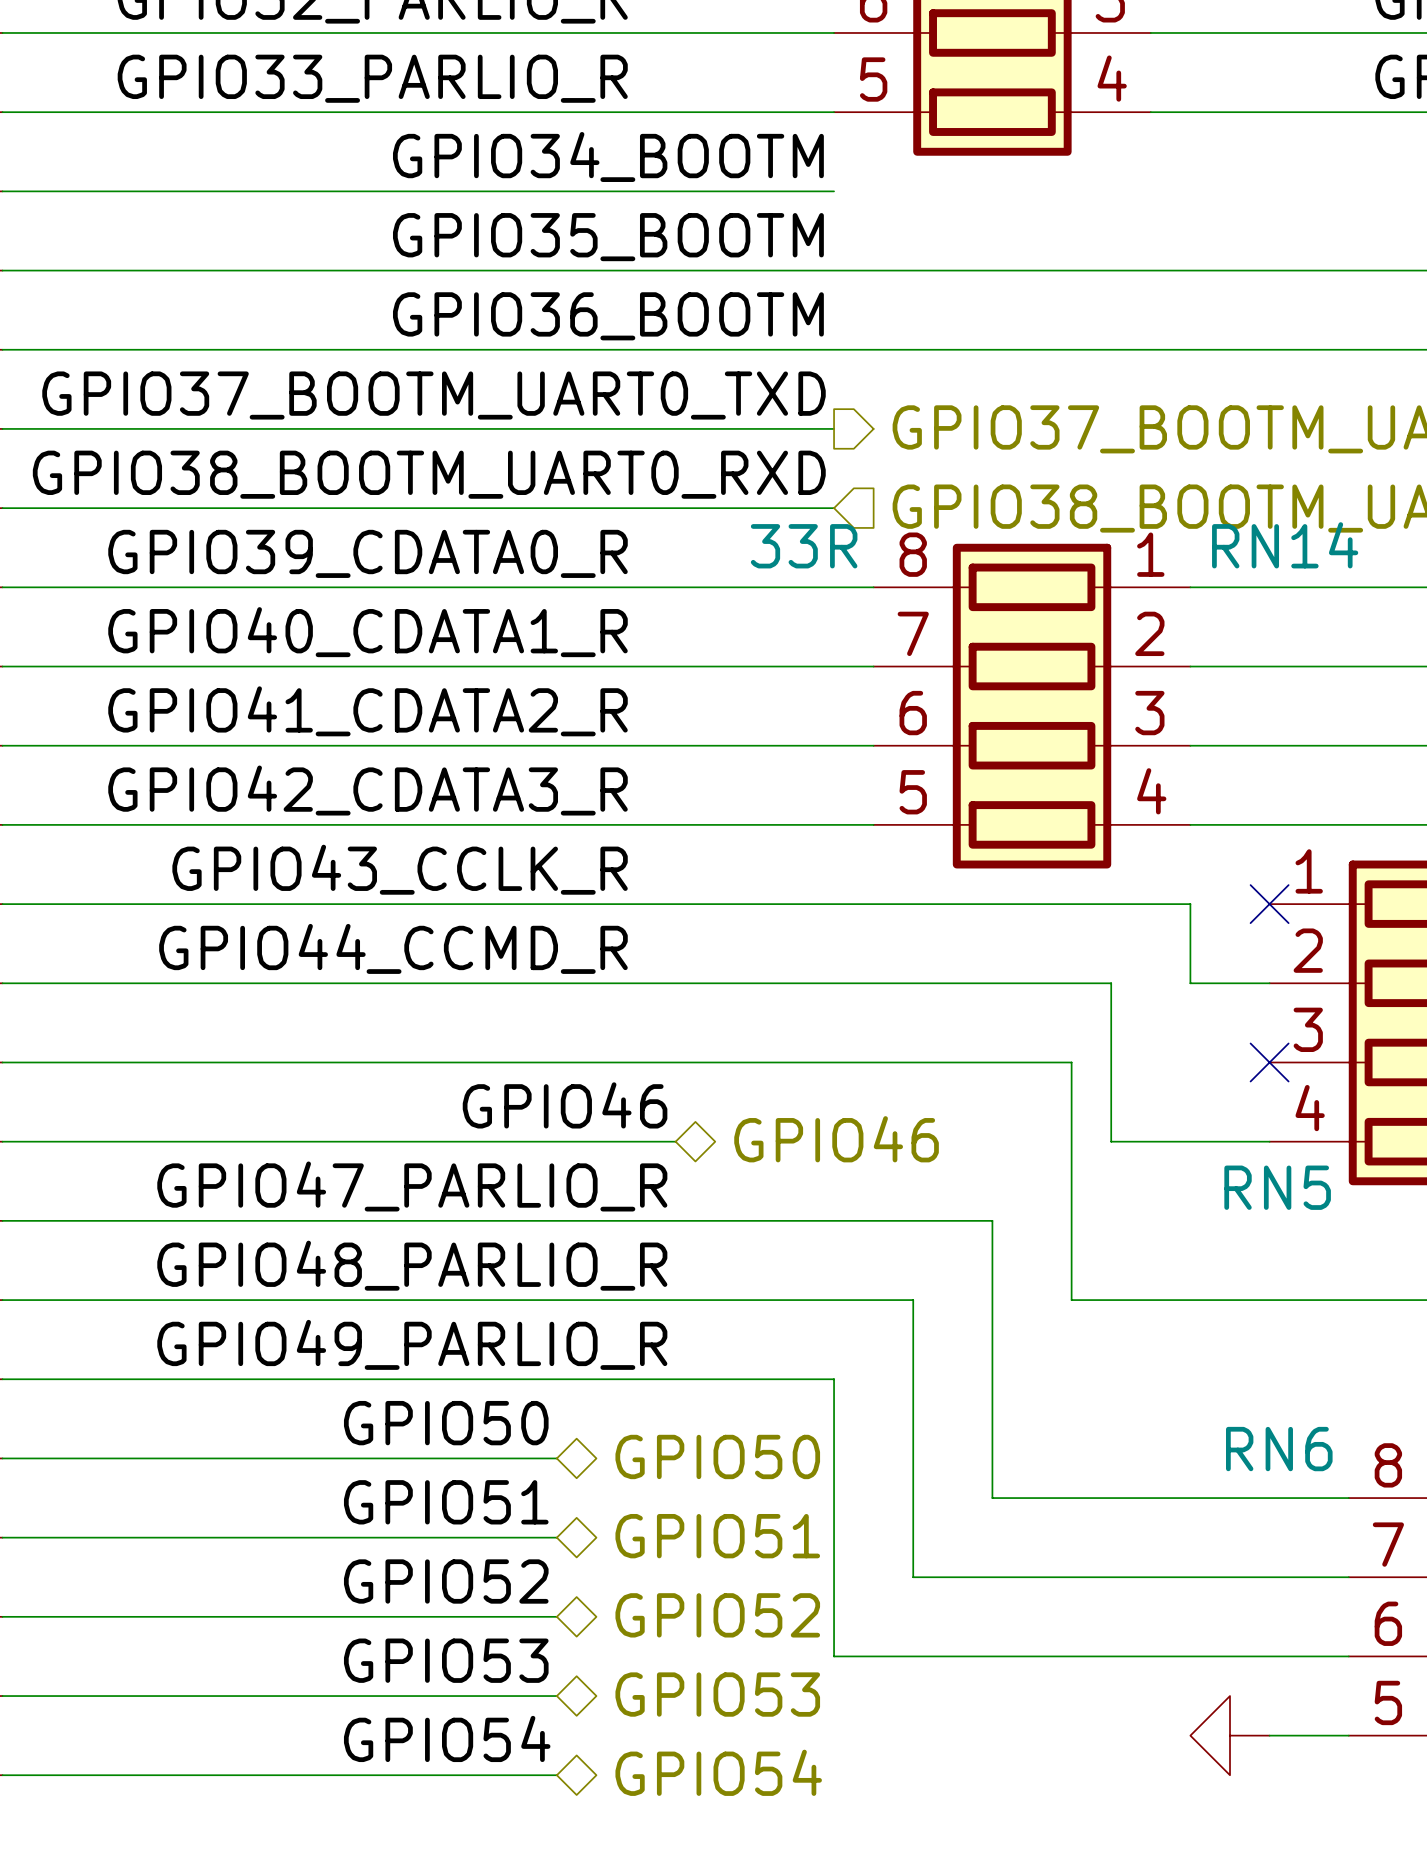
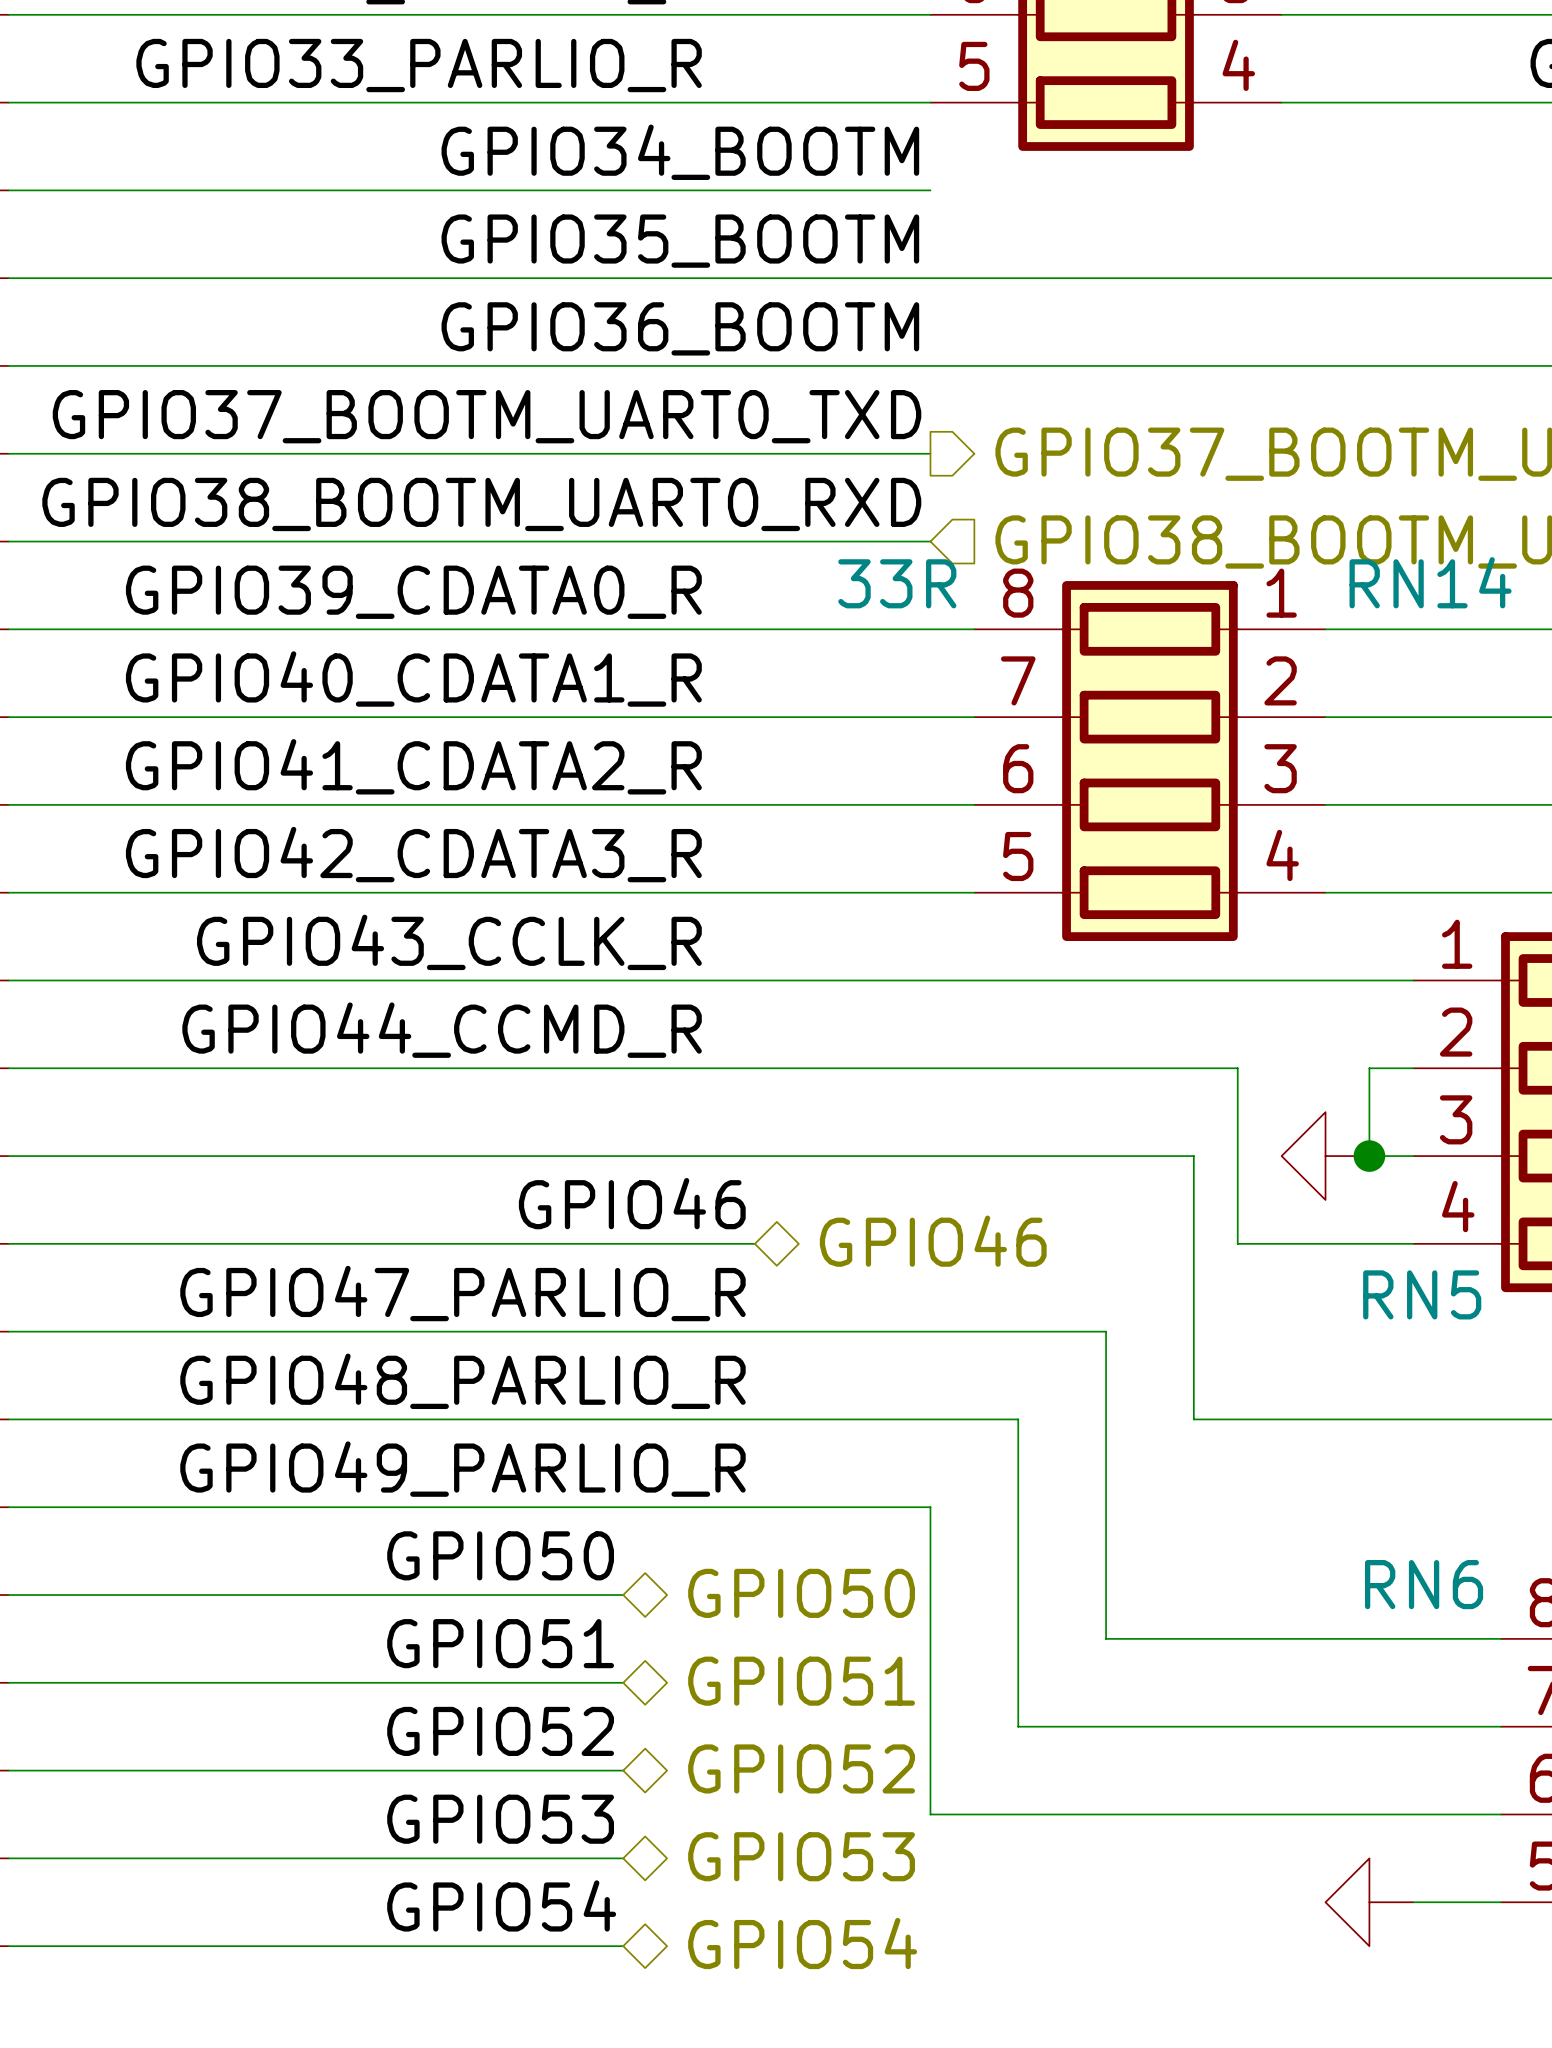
wire: (1190, 904) (1190, 983) (1230, 983) -> (1325, 980) (1413, 980)
no-connect mark: (1269, 904) -> none
wire: none -> (1369, 1068) (1369, 1156) (1413, 1156)
power symbol: none -> (1325, 1156)
junction: none -> (1369, 1156)
no-connect mark: (1269, 1062) -> none

